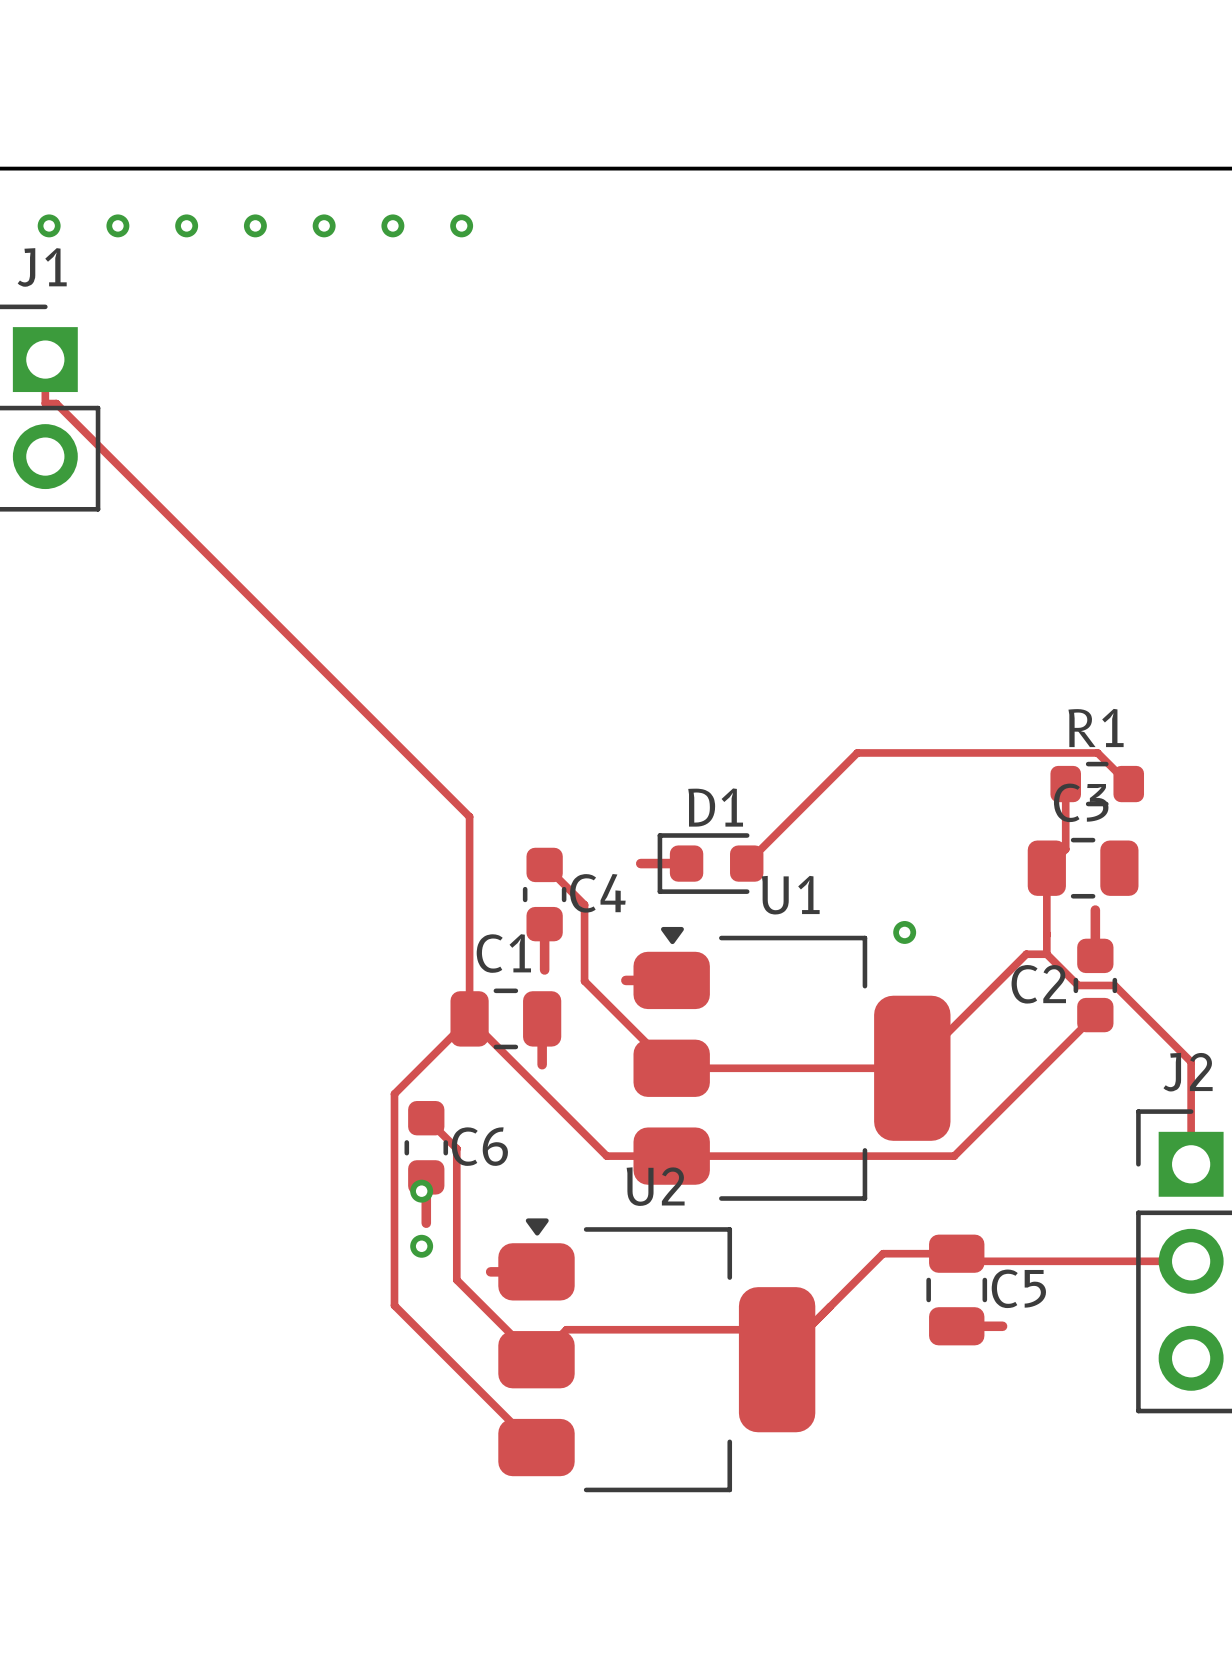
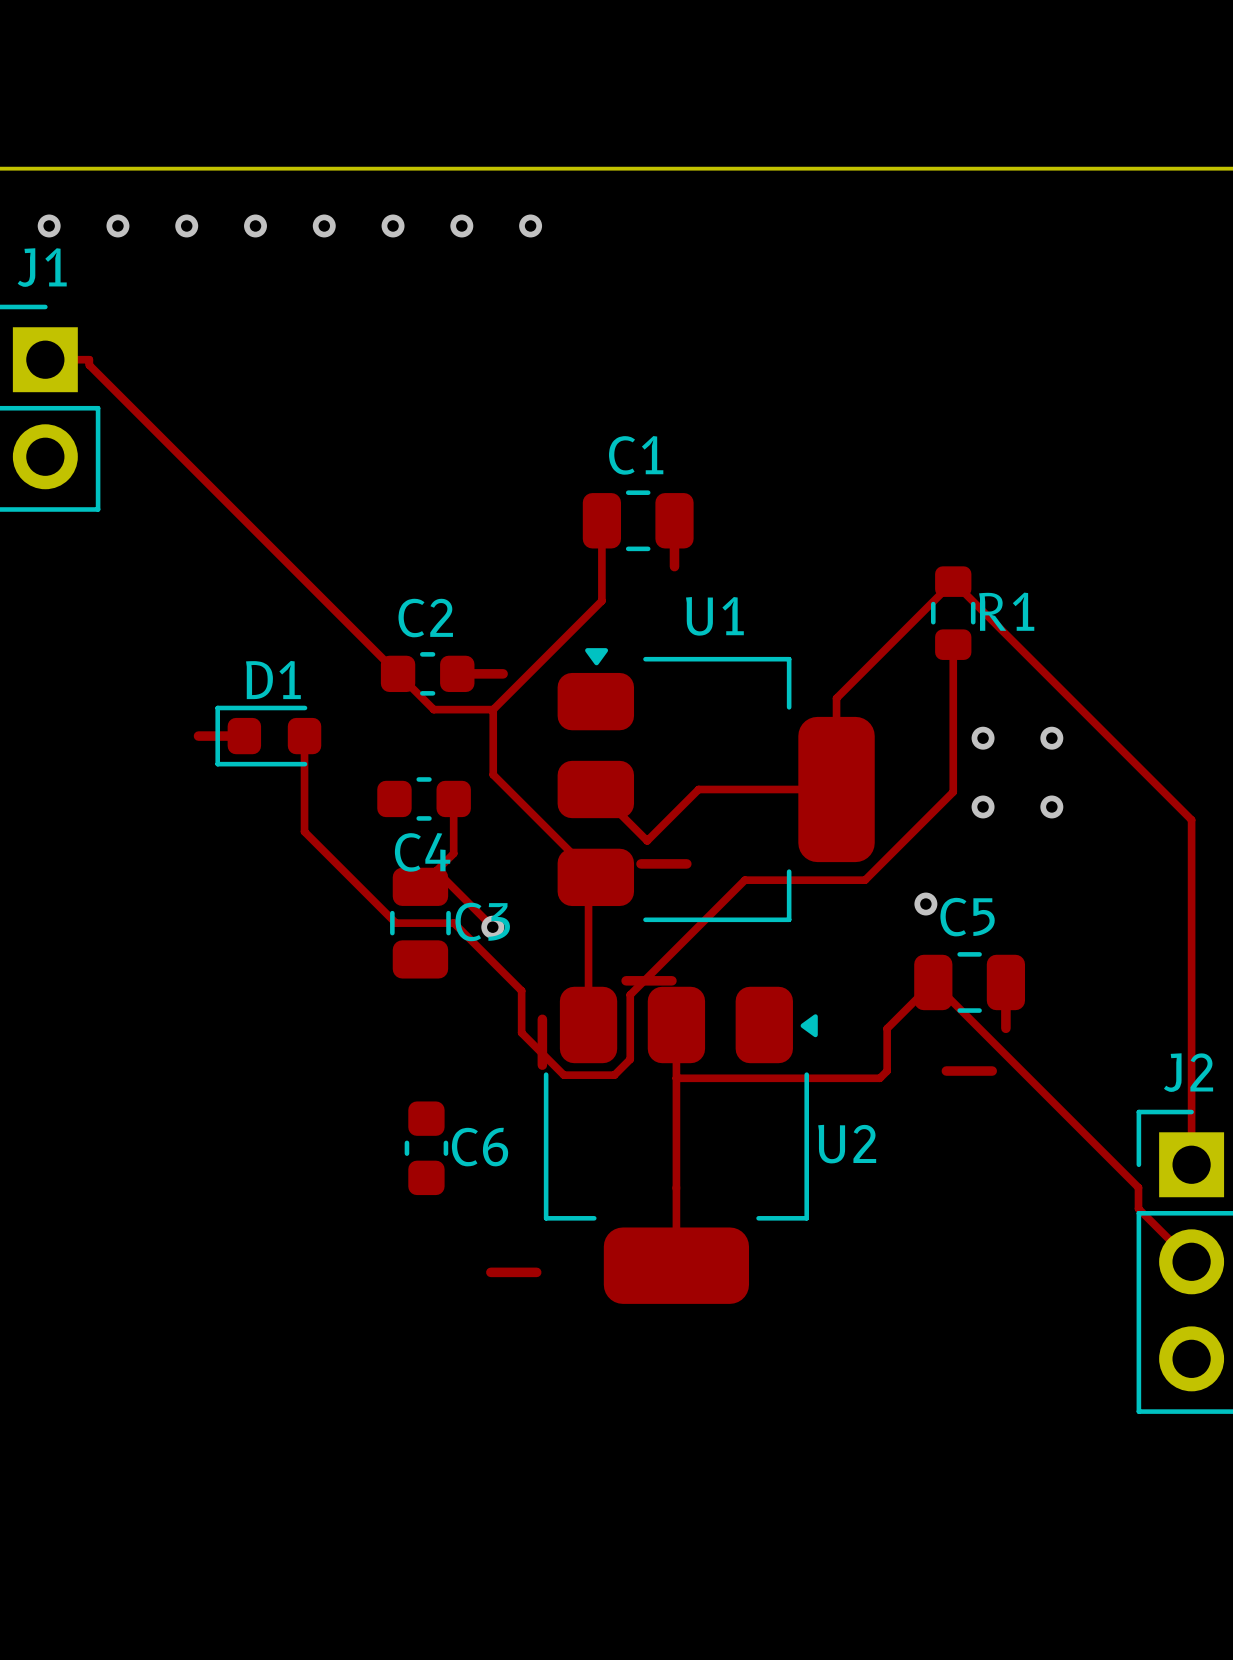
via: none -> (530, 225)
track: (45, 359) (45, 403) (56, 403) (469, 816) (469, 1018) -> (45, 359) (89, 359) (89, 365) (433, 709) (493, 709)
track: none -> (601, 520) (601, 600) (493, 709)
track: none -> (953, 644) (953, 792) (865, 880) (744, 880) (630, 994) (630, 1059) (614, 1075) (563, 1075) (521, 1032) (521, 990) (453, 923) (395, 923) (304, 831) (304, 736)
track: none -> (457, 673) (503, 673)
track: none -> (493, 709) (493, 774) (595, 877) (588, 884) (588, 1024)
track: none -> (198, 736) (244, 736)
via: none -> (983, 738)
via: none -> (1051, 738)
track: (1065, 784) (1065, 849) (1046, 868) (1046, 954) -> none
R1 rotation: 0° (1097, 784) -> 90° clockwise (953, 613)
R1 position: (1097, 784) -> (953, 613)
track: (1128, 784) (1097, 752) (857, 752) (746, 863) -> none
track: none -> (453, 798) (453, 853) (420, 886)
via: none -> (983, 806)
via: none -> (1051, 806)
D1 position: (710, 863) -> (268, 736)
track: (544, 864) (584, 904) (584, 981) (671, 1068) (912, 1068) (1026, 954) (1046, 954) -> none
C3 rotation: 0° (1083, 868) -> 90° clockwise (420, 923)
C3 position: (1083, 868) -> (420, 923)
track: none -> (436, 870) (492, 927)
C4 rotation: 0° (544, 894) -> 90° clockwise (424, 798)
C4 position: (544, 894) -> (424, 798)
track: (1095, 910) (1095, 955) -> (1005, 982) (1005, 1028)
track: (544, 924) (544, 969) -> (674, 520) (674, 566)
via: none -> (492, 927)
via position: (904, 932) -> (925, 904)
track: (1046, 954) (1078, 985) (1114, 985) (1191, 1061) -> (595, 789) (647, 840) (698, 789) (836, 789) (836, 698) (953, 581) (1191, 819) (1191, 1062)
C2 rotation: 0° (1095, 985) -> 90° clockwise (427, 673)
C2 position: (1095, 985) -> (427, 673)
track: (1095, 1015) (954, 1156) (606, 1156) (469, 1018) -> none
track: (469, 1018) (394, 1093) (394, 1305) (536, 1447) -> none
C1 position: (505, 1018) -> (638, 520)
track: none -> (676, 1024) (676, 1265)
U1 position: (791, 1063) -> (716, 785)
track: (426, 1118) (456, 1148) (456, 1280) (536, 1359) (566, 1329) (807, 1329) -> none
track: (426, 1177) (426, 1223) -> none
via: (421, 1191) -> none
via: (421, 1246) -> none
track: (1191, 1261) (964, 1261) (956, 1253) (883, 1253) (777, 1359) -> (1191, 1261) (1138, 1208) (1138, 1187) (933, 982) (887, 1028) (887, 1071) (879, 1078) (676, 1078)
C5 name position: C5 (1018, 1288) -> C5 (967, 917)
C5 rotation: 0° (956, 1289) -> 90° clockwise (969, 982)
C5 position: (956, 1289) -> (969, 982)
track: (956, 1326) (1002, 1326) -> (946, 1071) (992, 1071)
U2 rotation: 0° (656, 1355) -> 90° clockwise (680, 1145)
U2 position: (656, 1355) -> (680, 1145)

